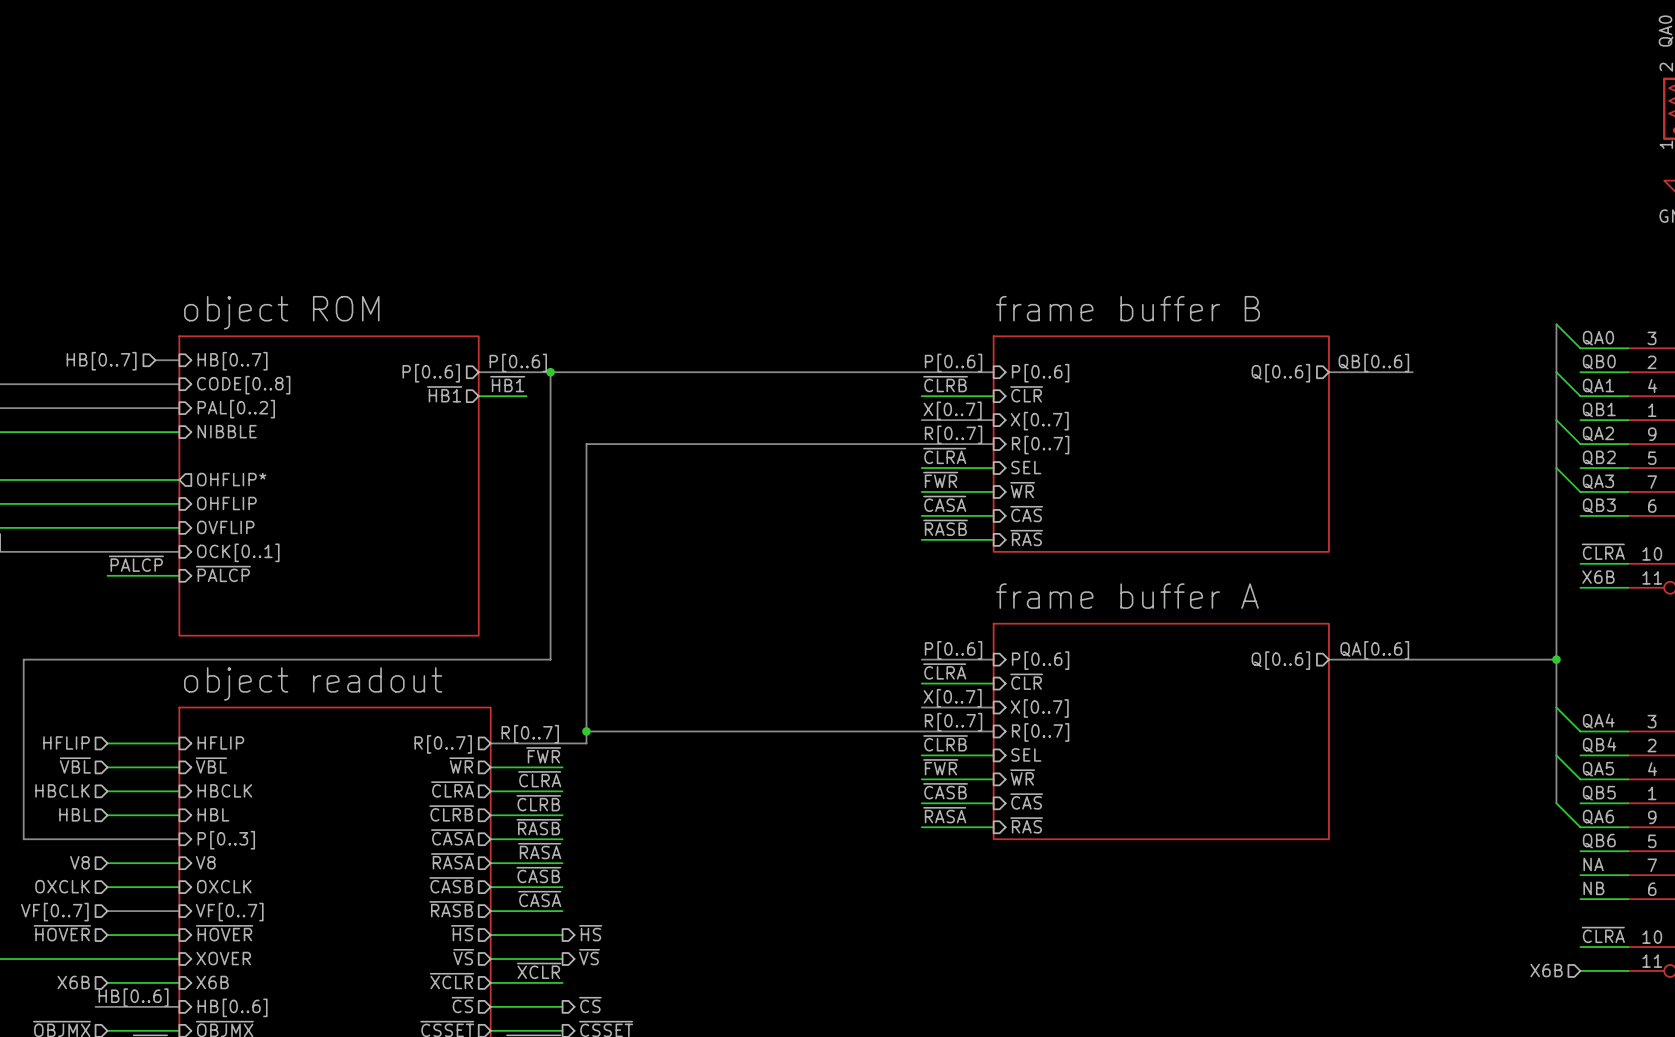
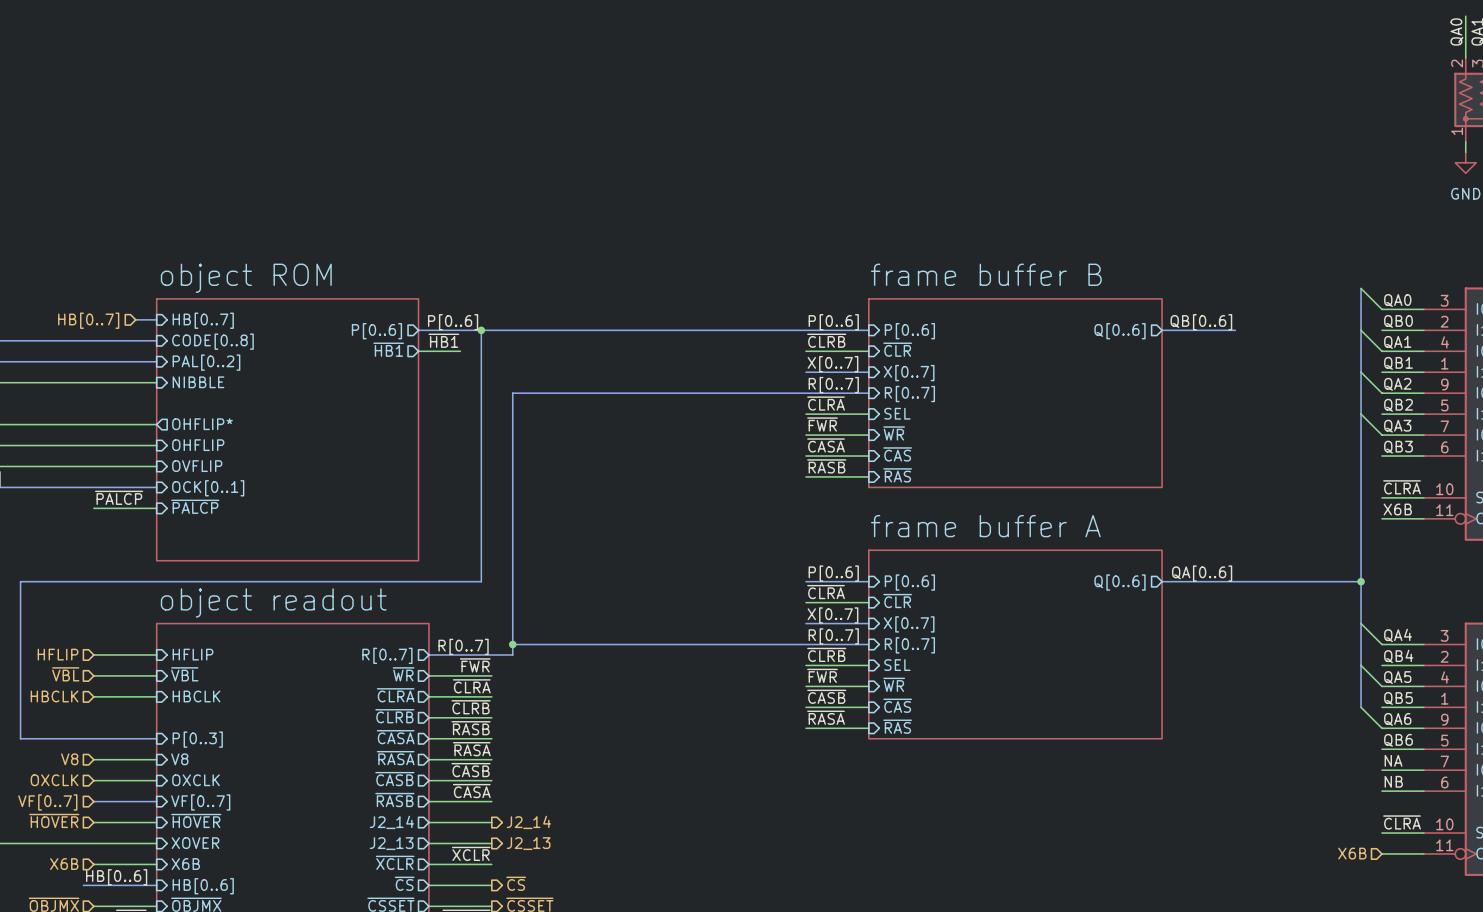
hierarchical label: HBL (75, 814) -> none
sheet pin: HBL (213, 814) -> none
wire: (107, 815) (179, 815) -> none
sheet pin: ~{HS} (462, 933) -> J2_14 (391, 822)
hierarchical label: ~{HS} (590, 933) -> J2_14 (528, 822)
sheet pin: ~{VS} (463, 957) -> J2_13 (391, 843)
hierarchical label: ~{VS} (589, 957) -> J2_13 (528, 843)

